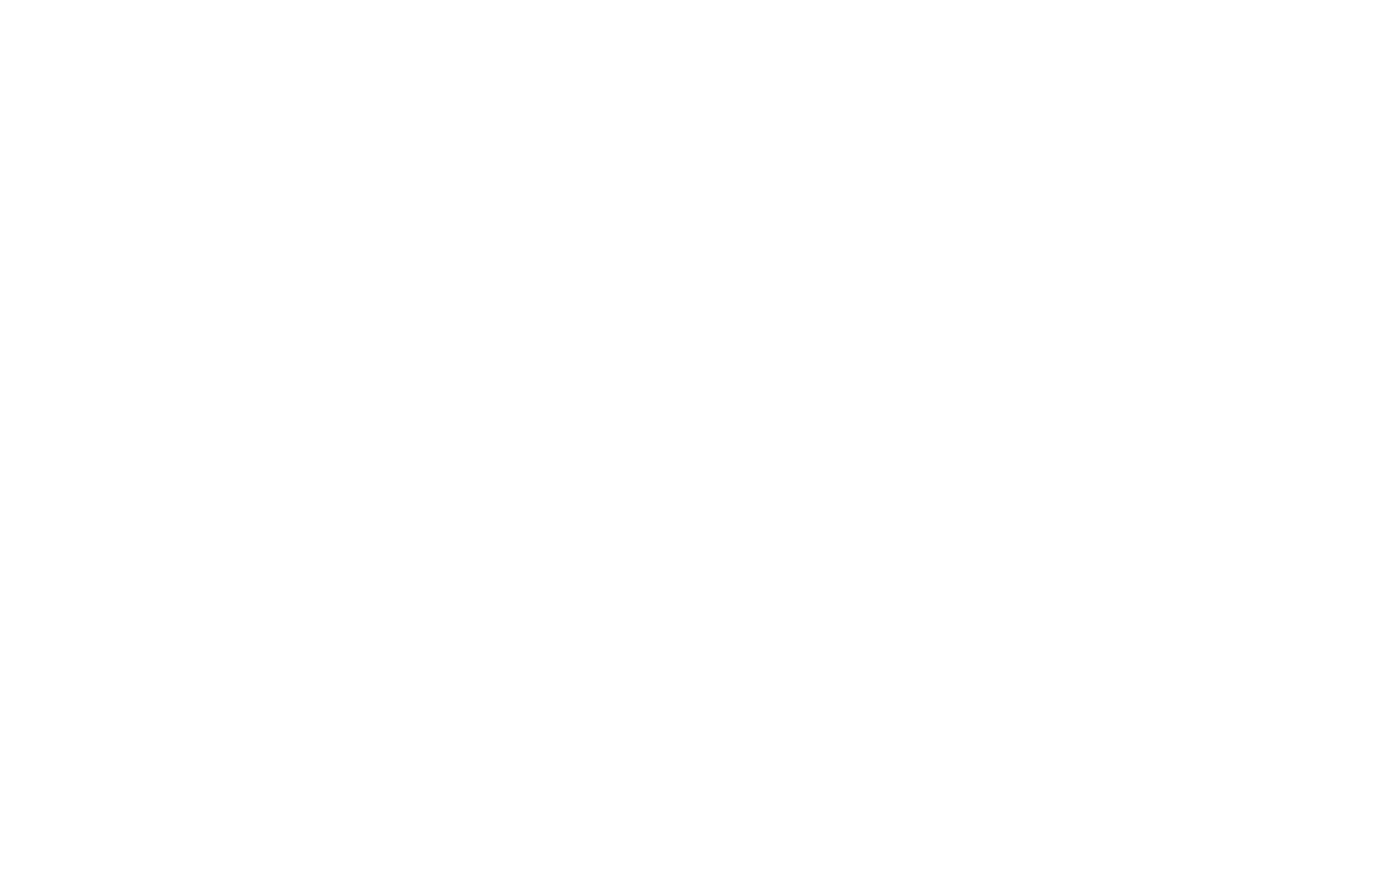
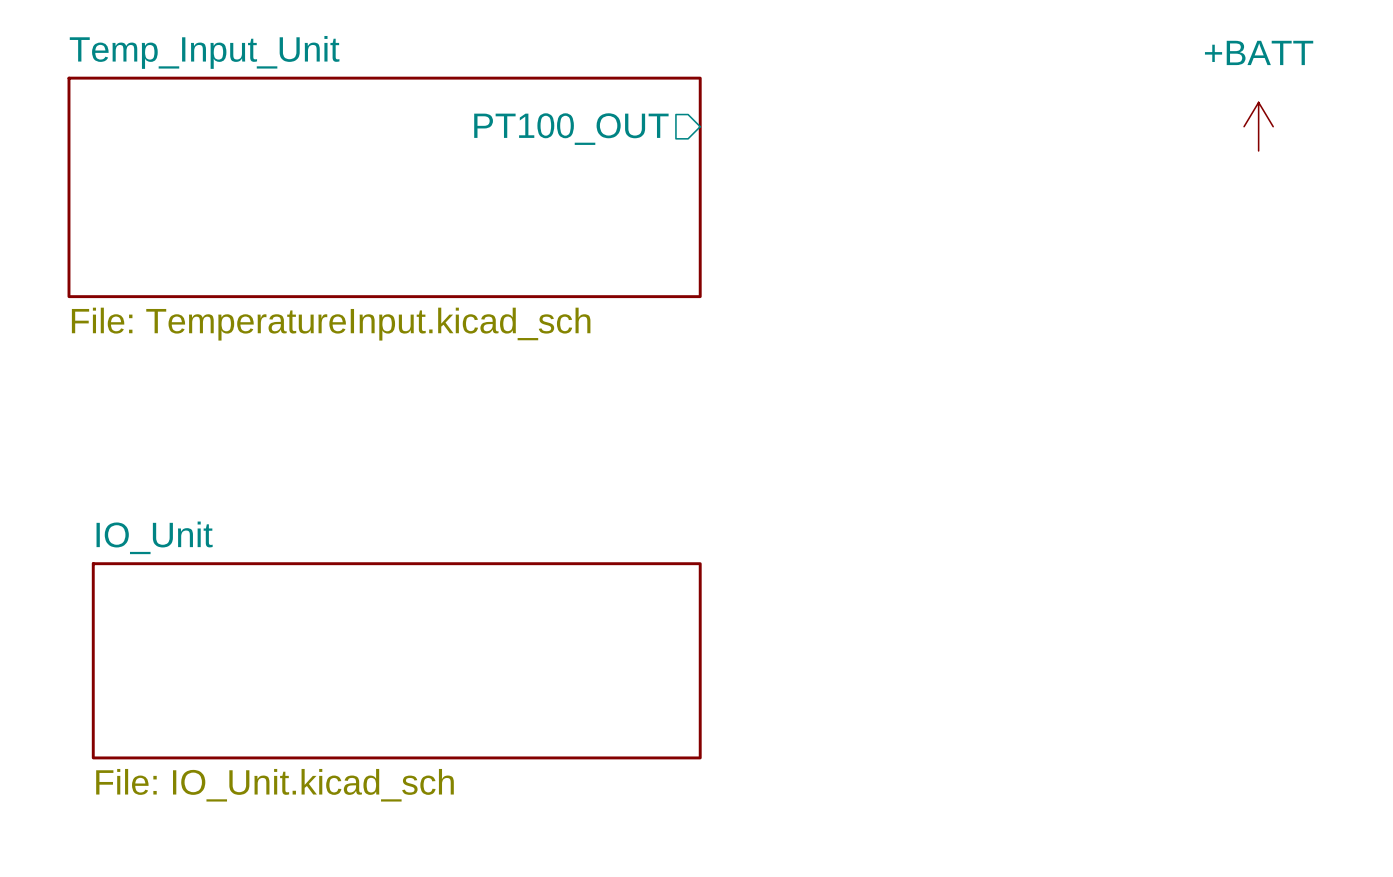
power symbol: none -> +BATT (1258, 126)
sheet pin: none -> PT100_OUT (571, 129)
sheet Temp_Input_Unit: none -> File: TemperatureInput.kicad_sch (384, 187)
sheet IO_Unit: none -> File: IO_Unit.kicad_sch (396, 660)

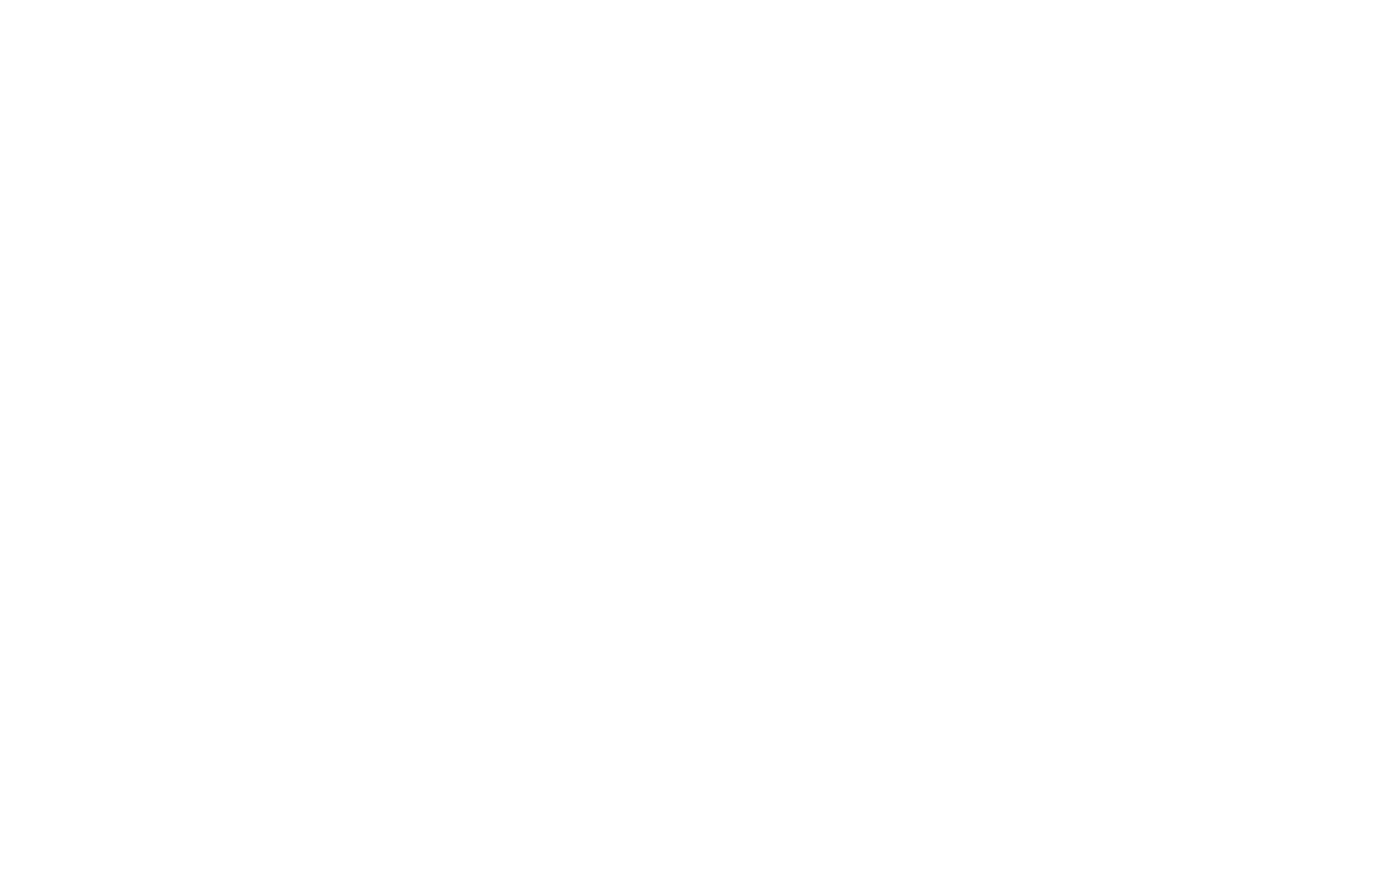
power symbol: +BATT (1258, 126) -> none
sheet pin: PT100_OUT (571, 129) -> none
sheet Temp_Input_Unit: File: TemperatureInput.kicad_sch (384, 187) -> none
sheet IO_Unit: File: IO_Unit.kicad_sch (396, 660) -> none

